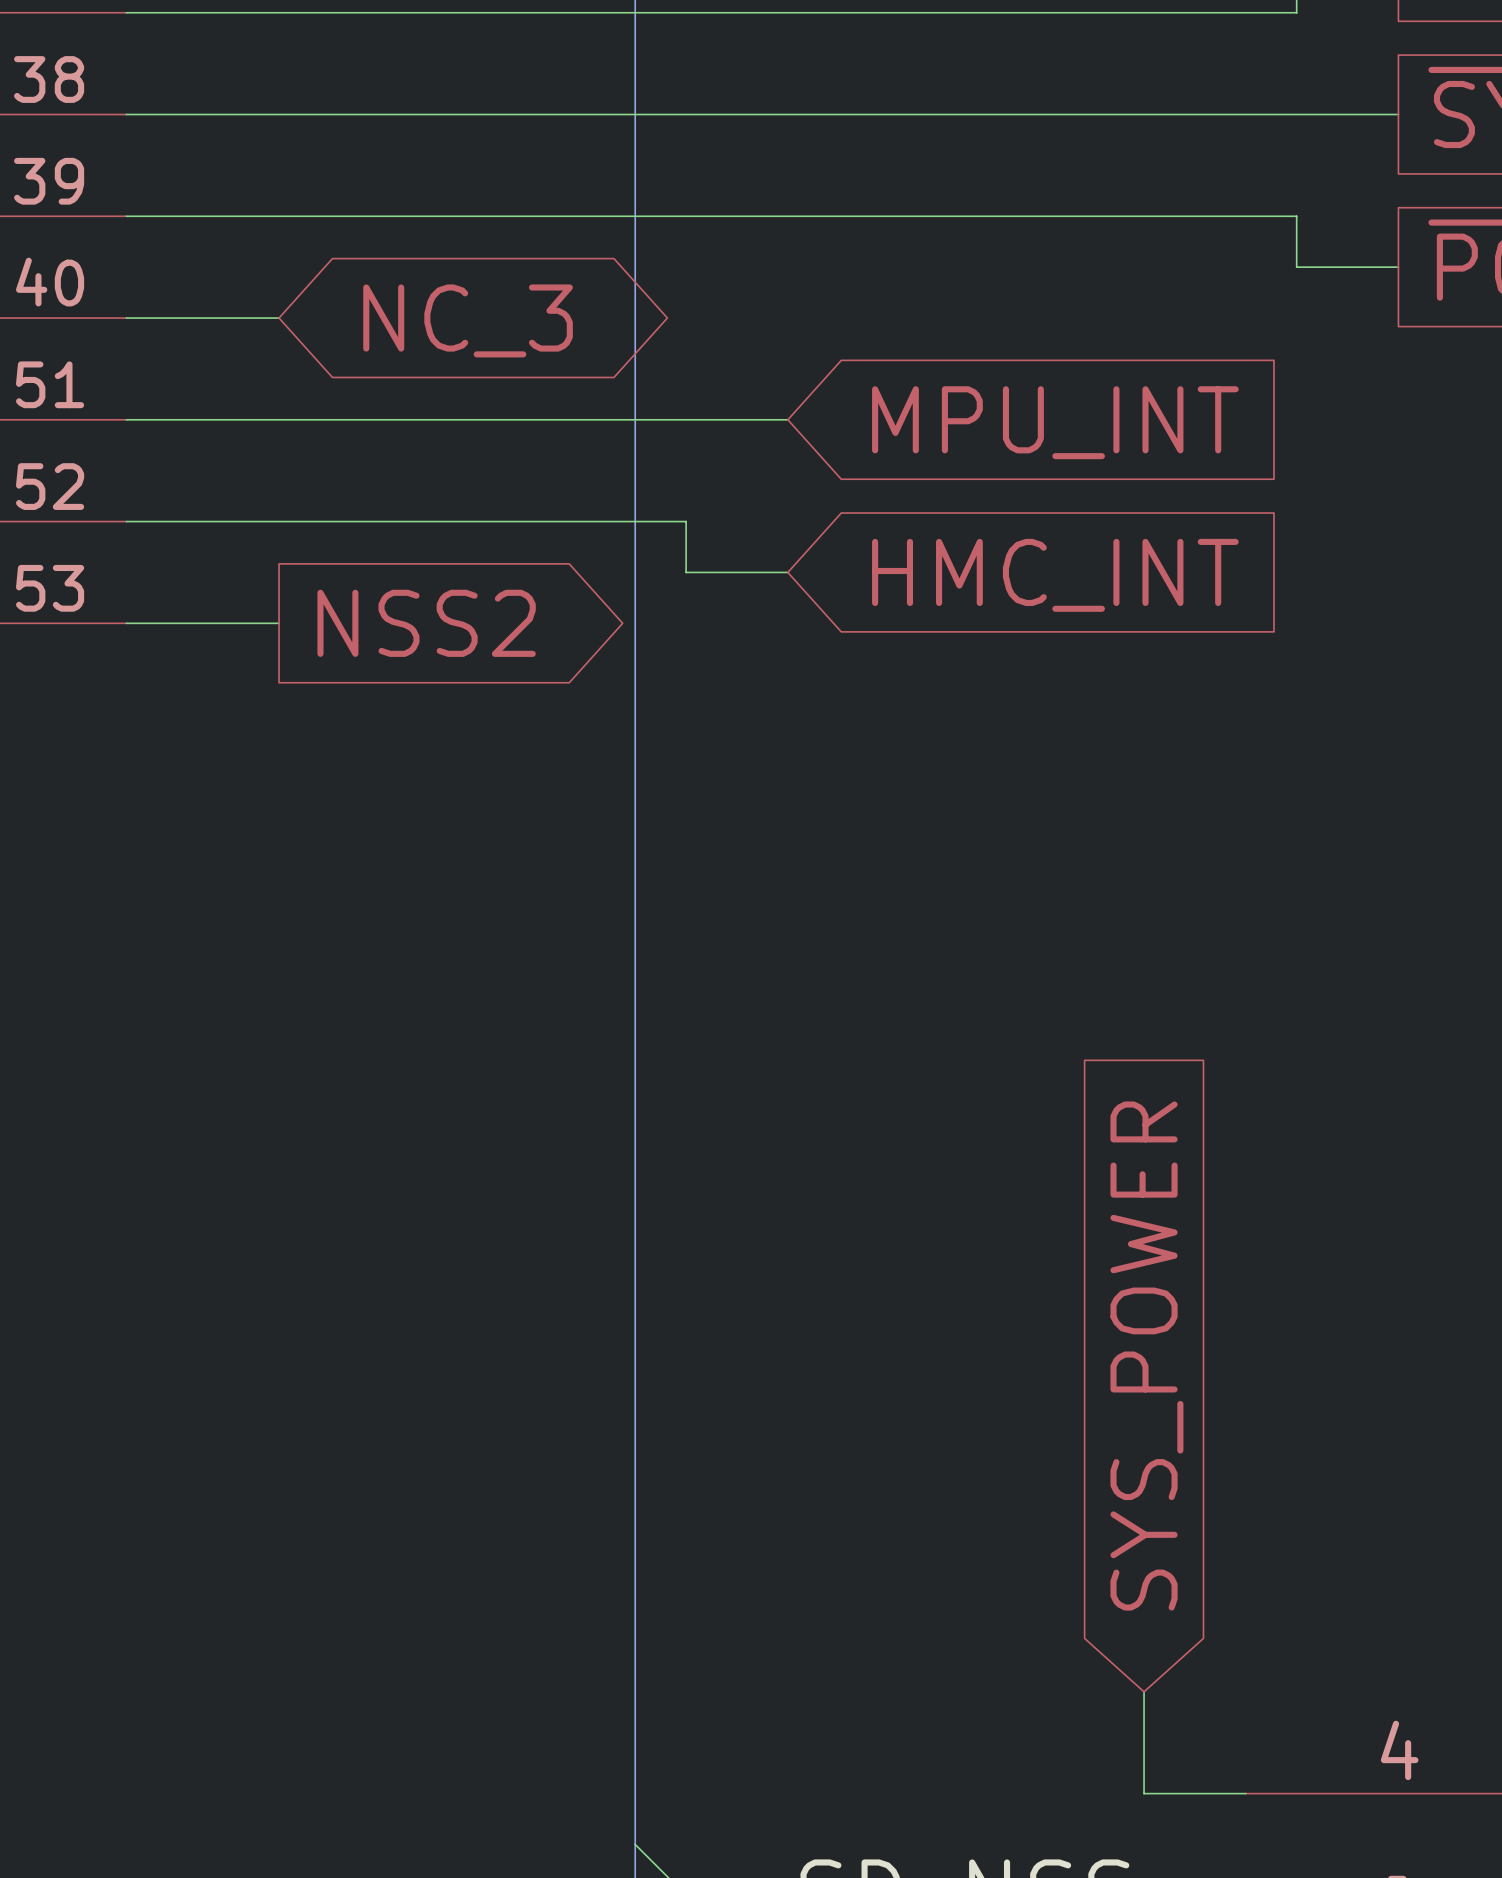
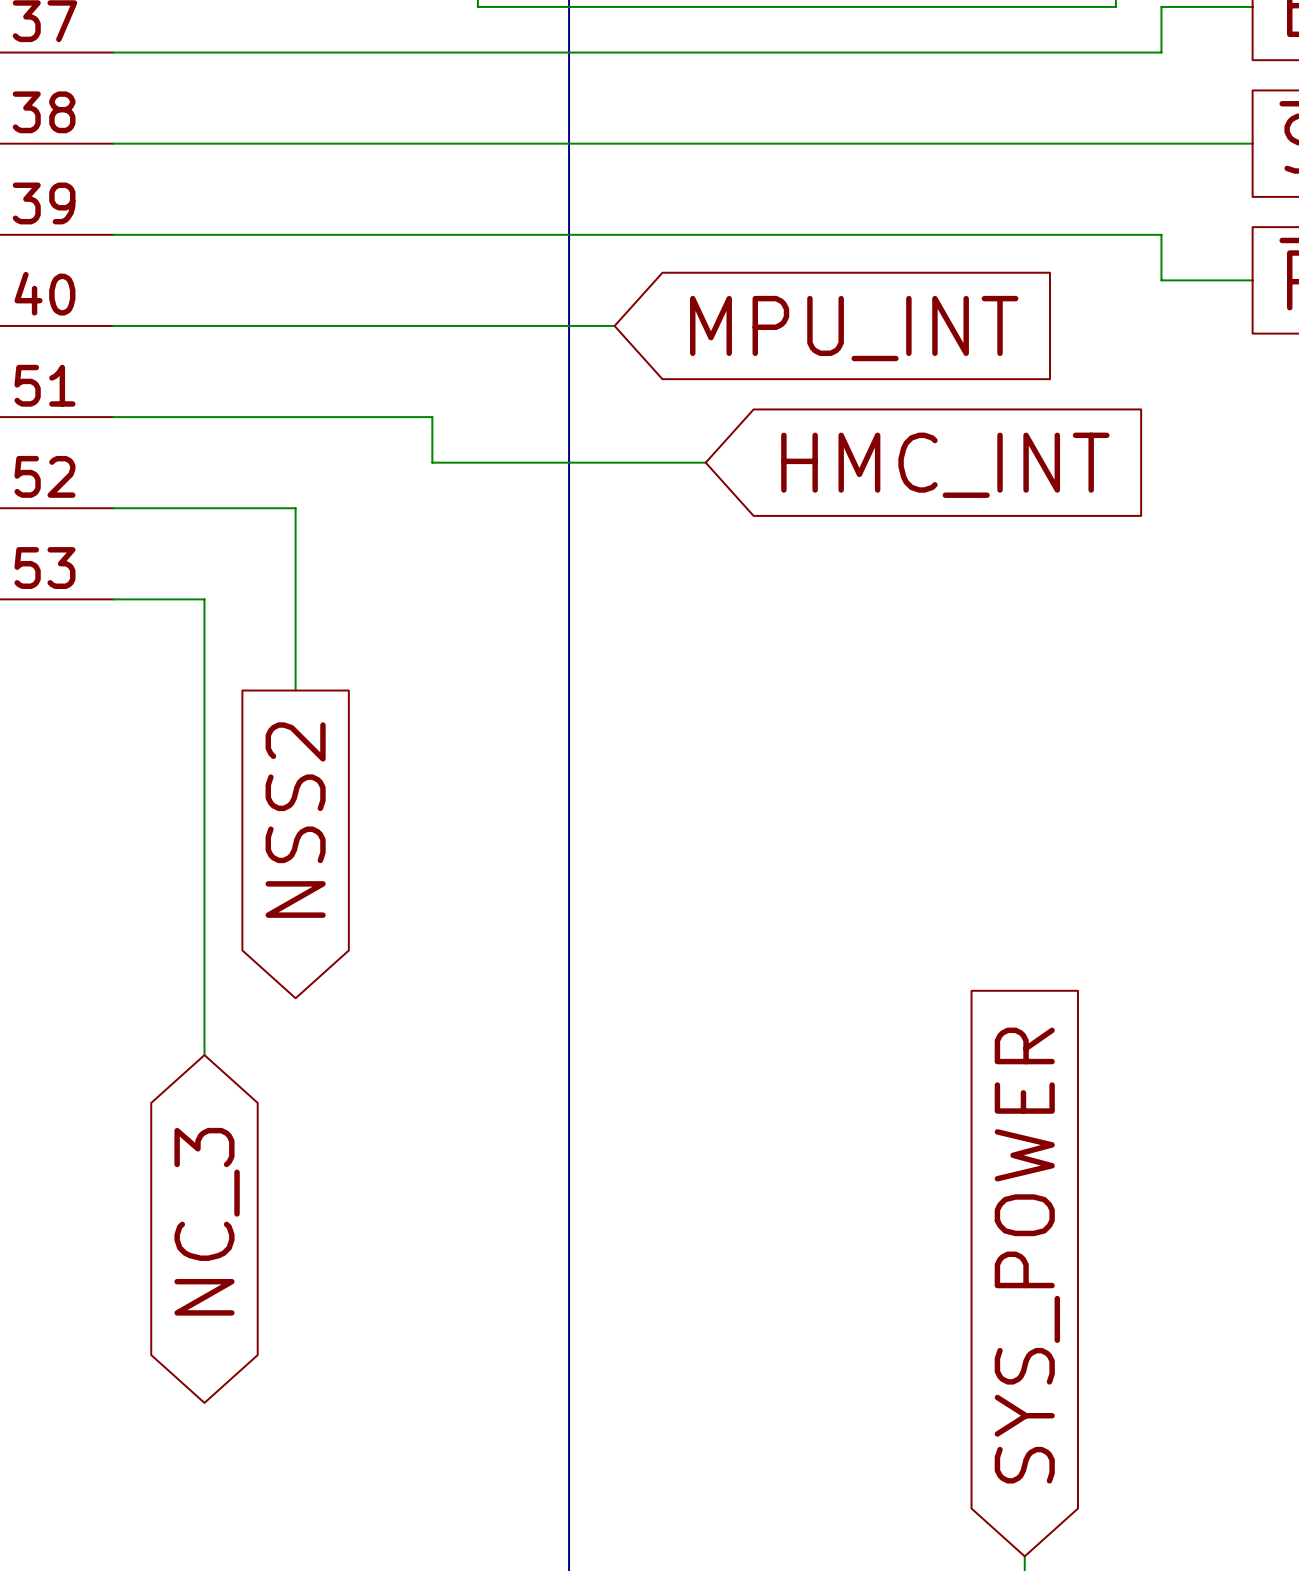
wire: none -> (250, 325) (614, 325)
global label rotation: 0° (468, 320) -> 90° clockwise (207, 1221)
global label position: NC_3 (468, 320) -> NC_3 (207, 1221)
wire: (482, 419) (787, 419) -> (432, 417) (432, 462) (705, 462)
global label position: MPU_INT (1055, 422) -> MPU_INT (854, 328)
wire: (329, 521) (686, 521) (686, 572) (787, 572) -> (295, 508) (295, 690)
global label position: HMC_INT (1055, 575) -> HMC_INT (945, 465)
wire: (228, 623) (279, 623) -> (204, 599) (204, 1055)
global label rotation: 0° (426, 623) -> 90° clockwise (295, 820)

